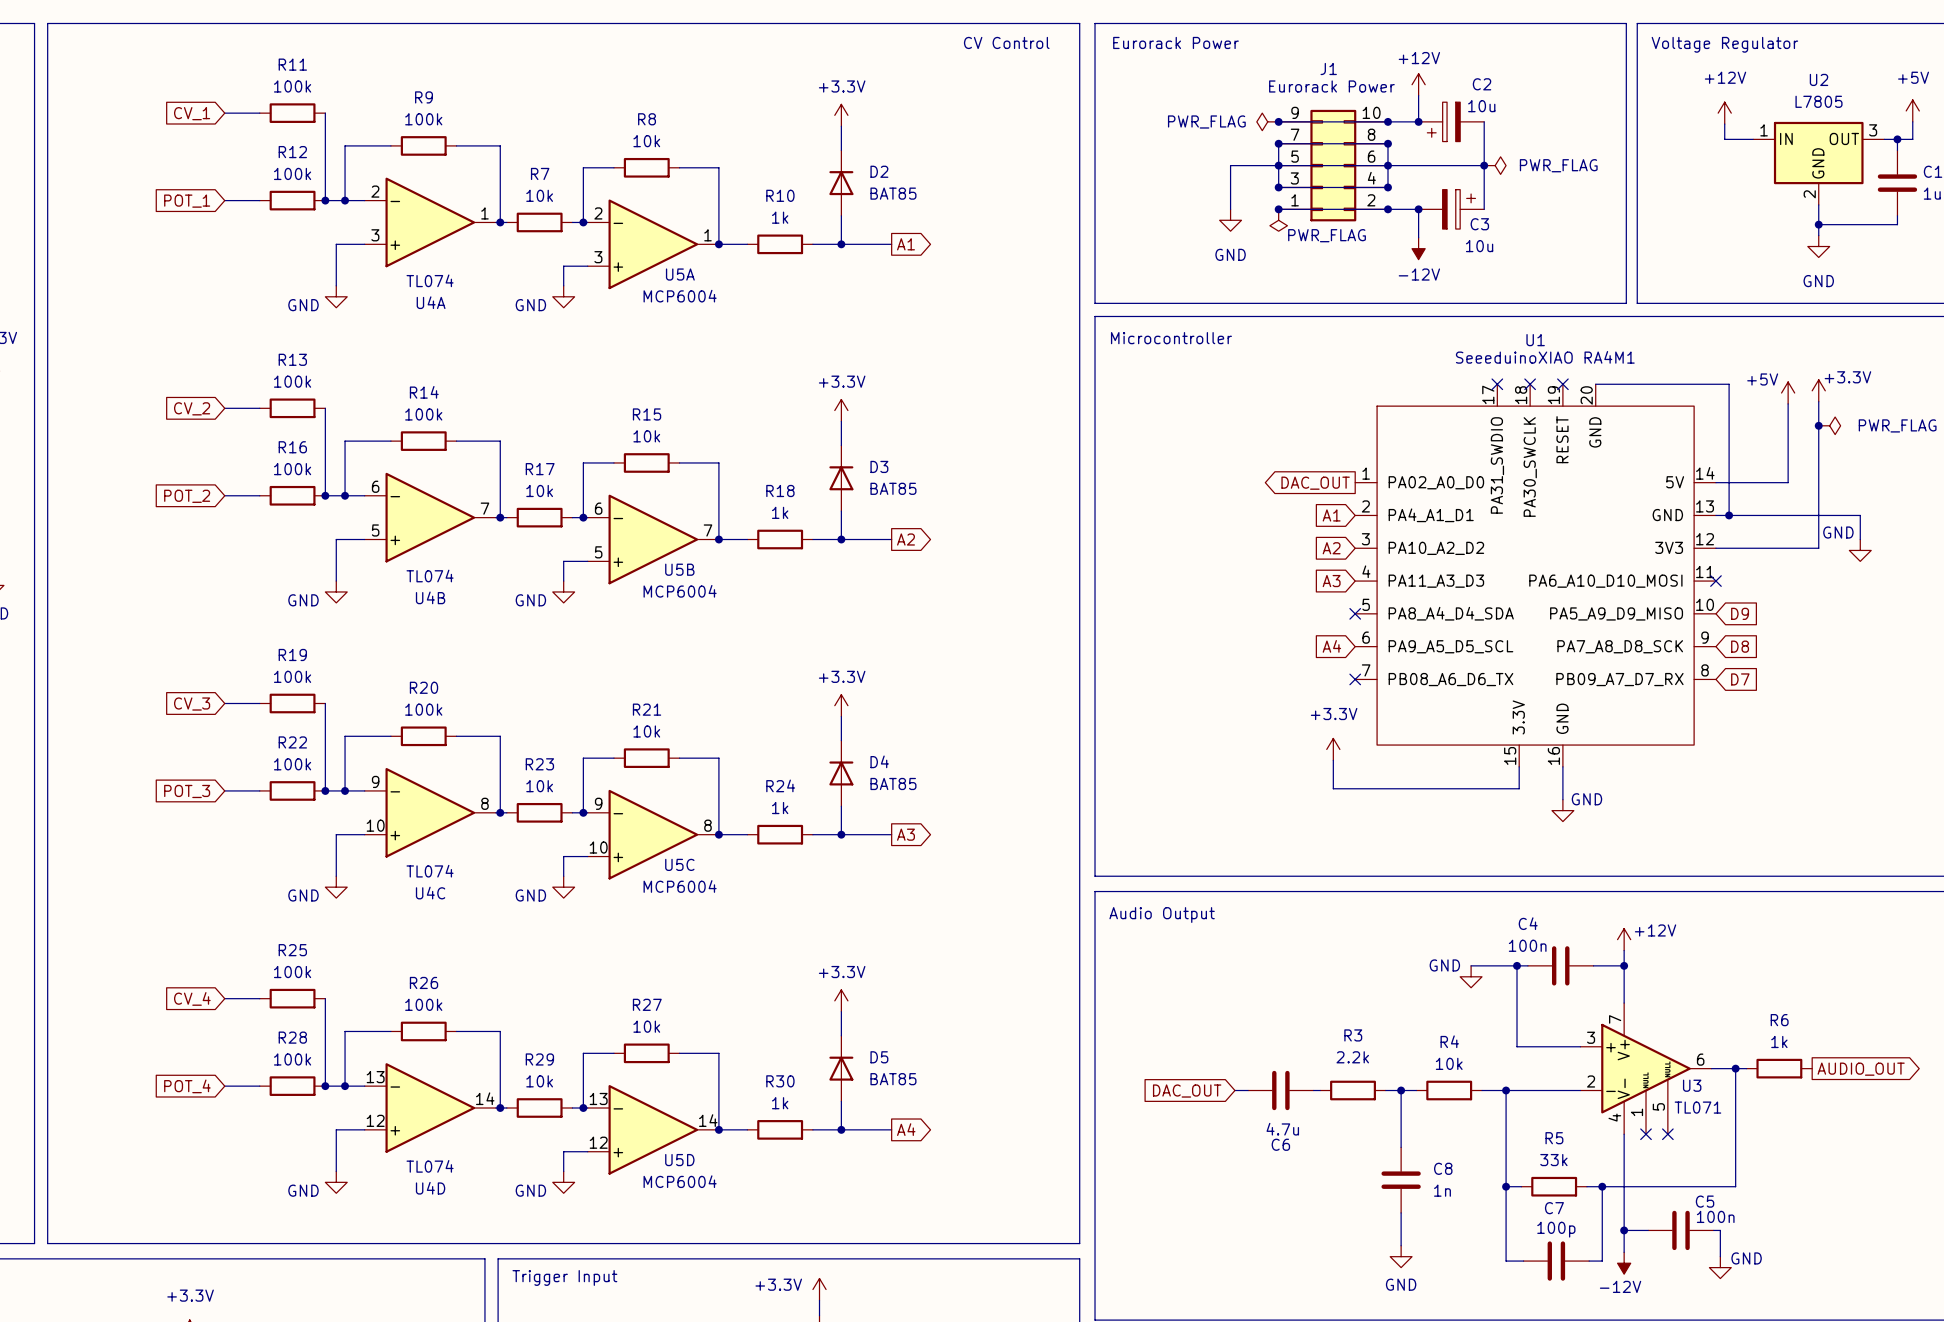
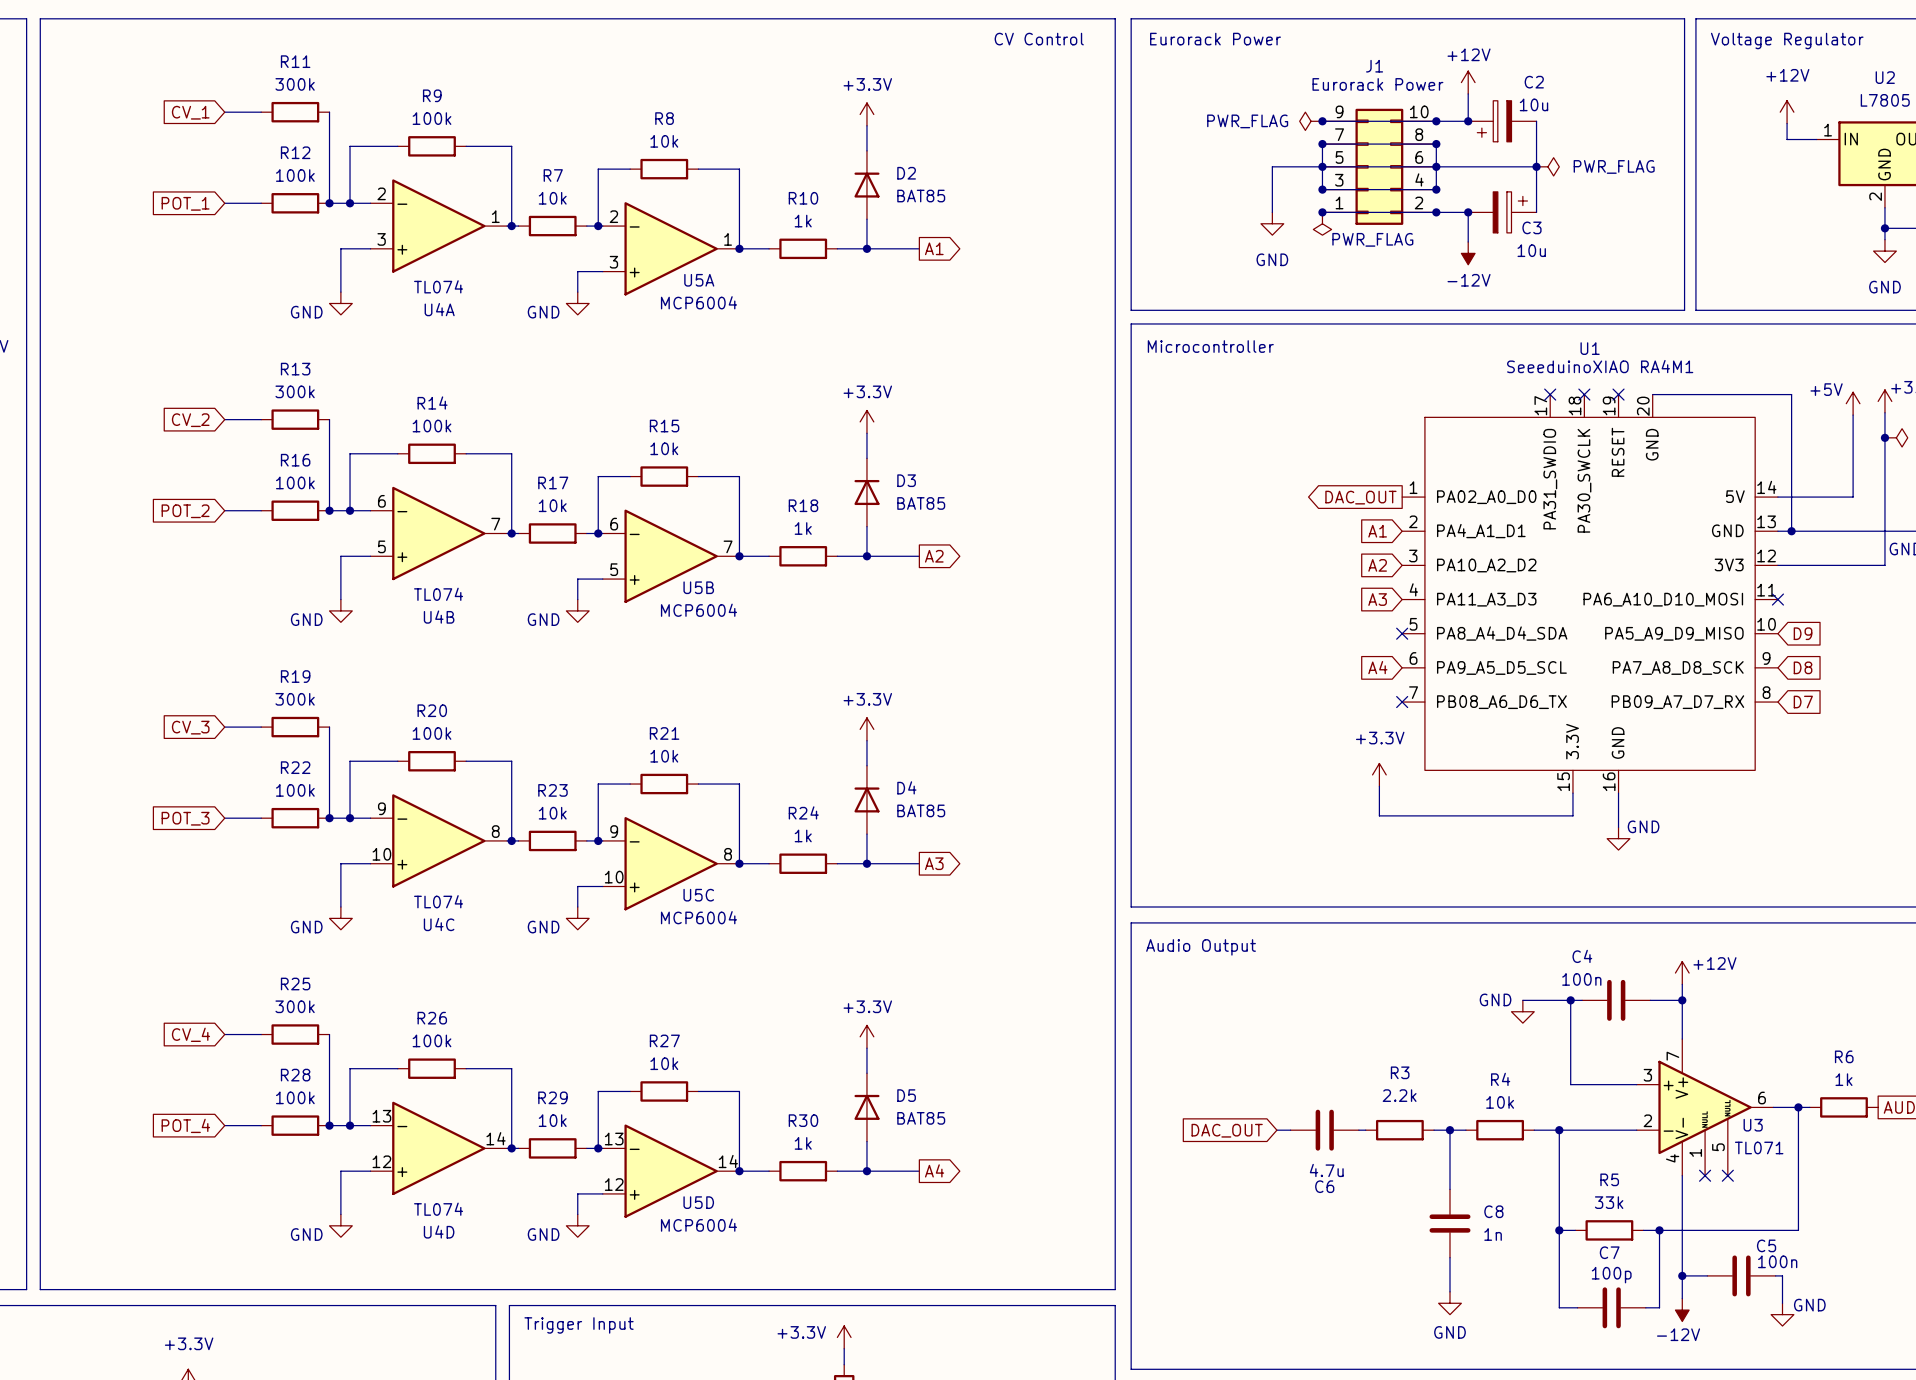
R11 value: 100k (292, 86) -> 300k (295, 84)
R13 value: 100k (292, 381) -> 300k (295, 391)
R19 value: 100k (292, 676) -> 300k (295, 699)
R25 value: 100k (292, 972) -> 300k (295, 1006)

